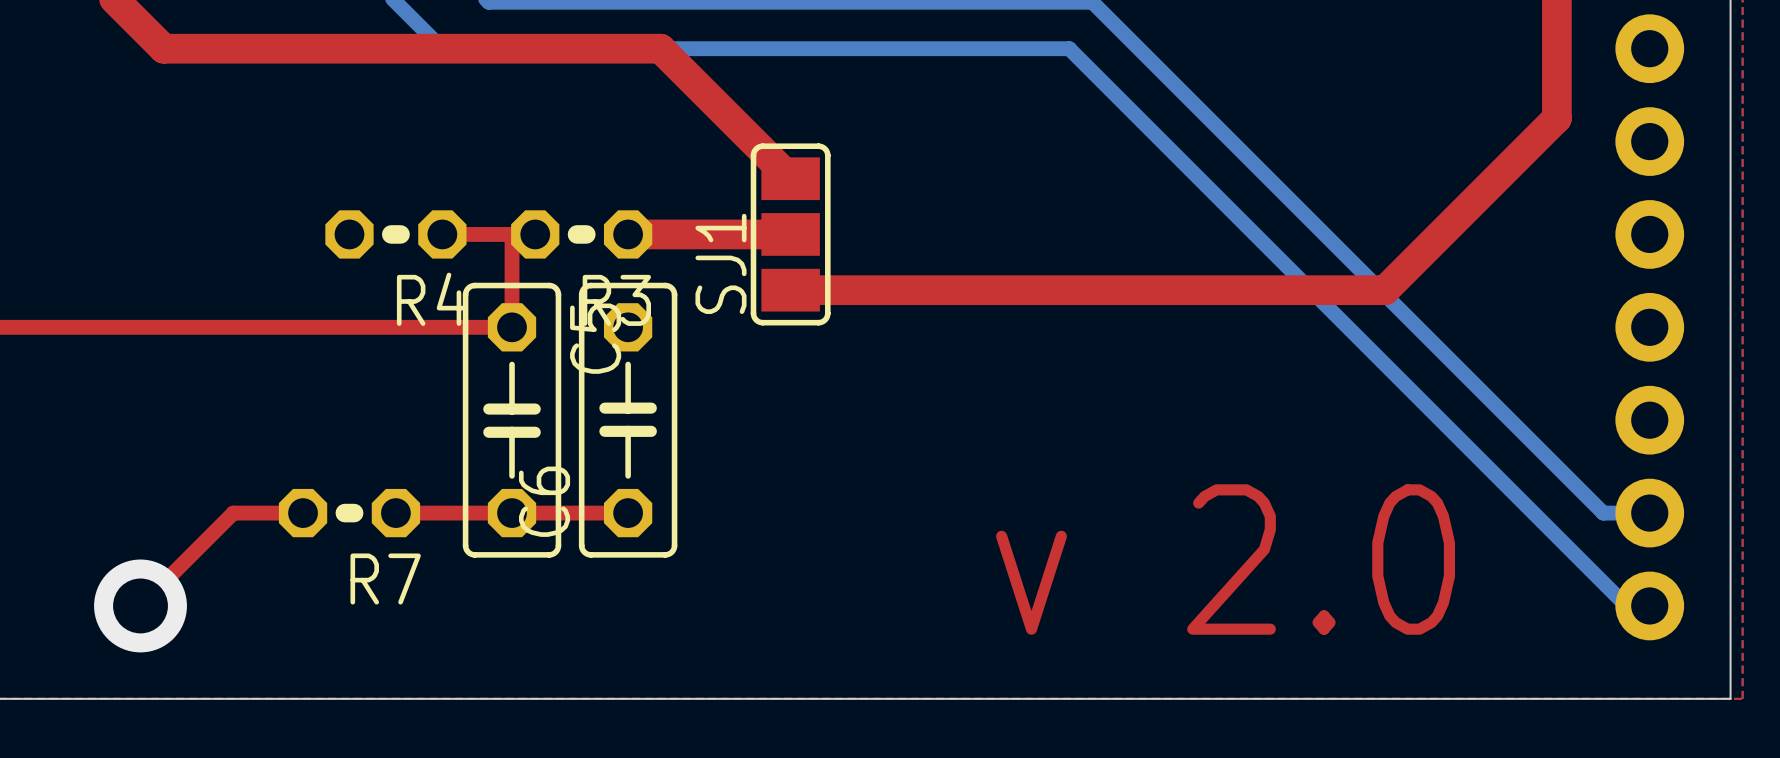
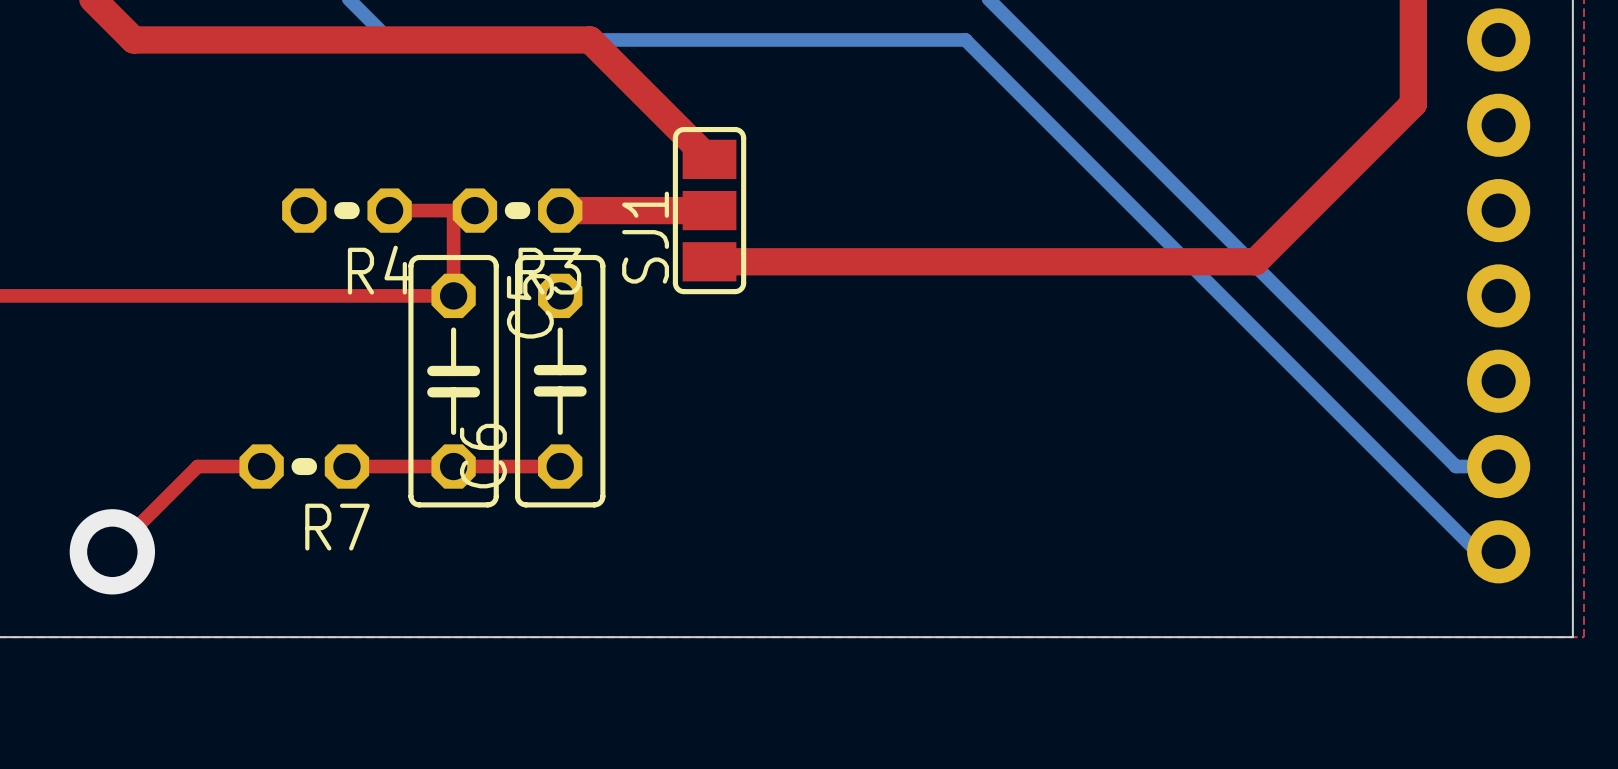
text: v 2.0 (1225, 559) -> none

